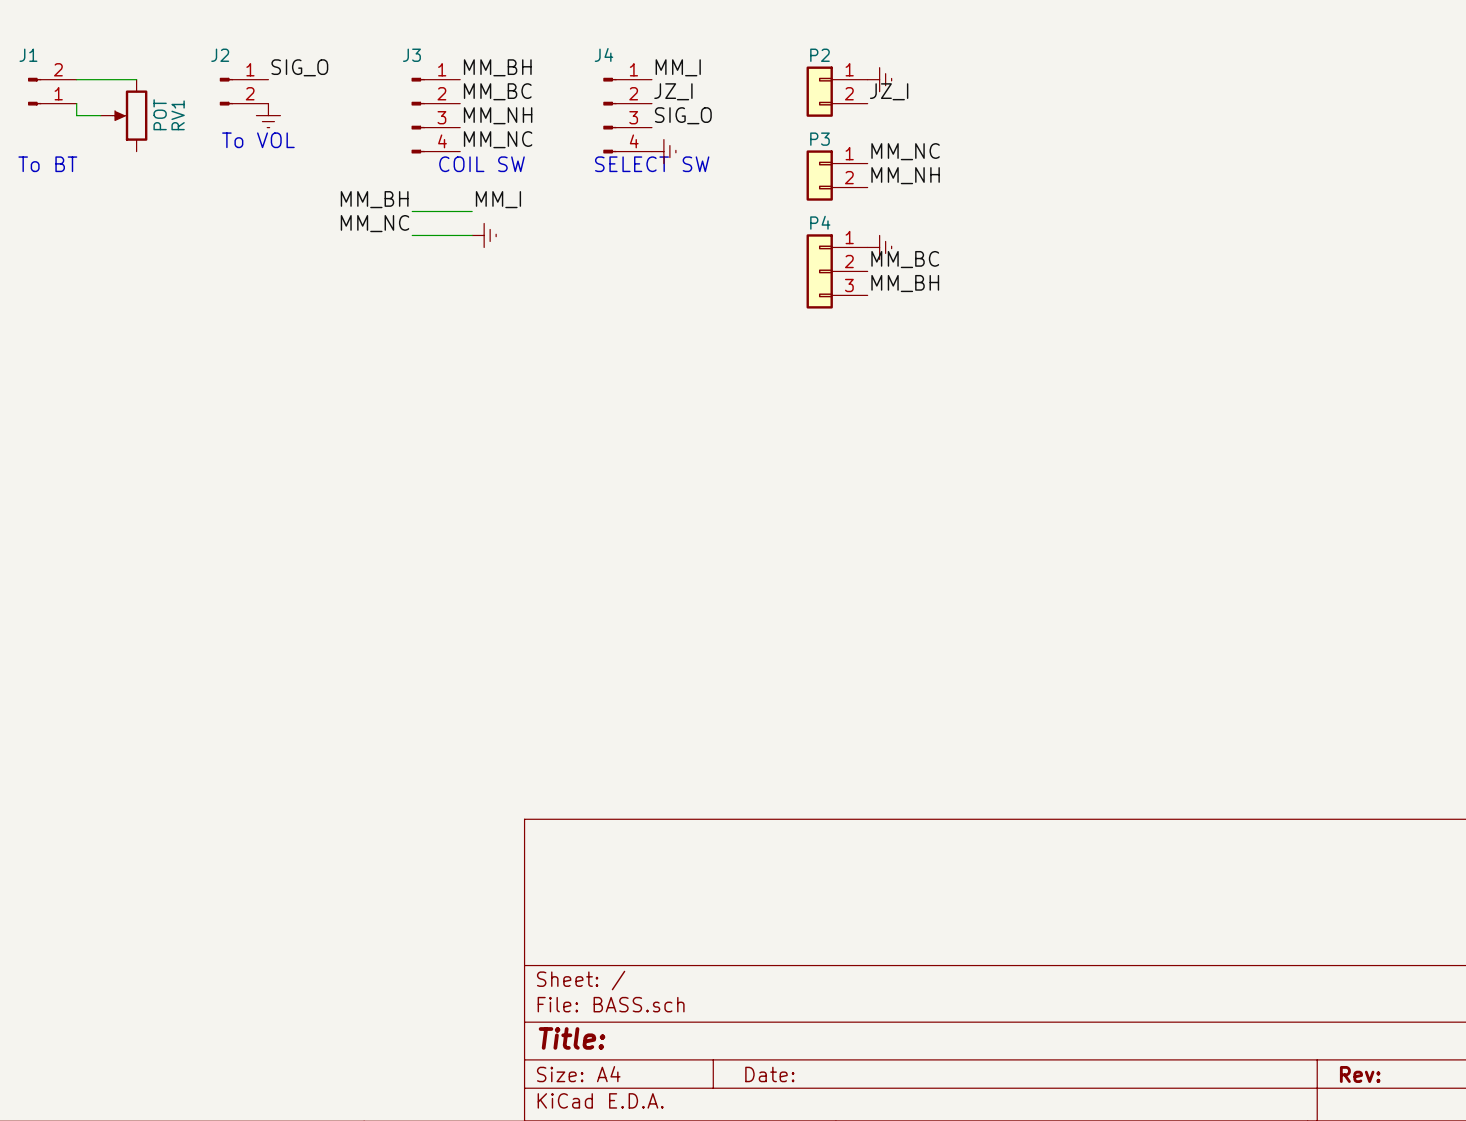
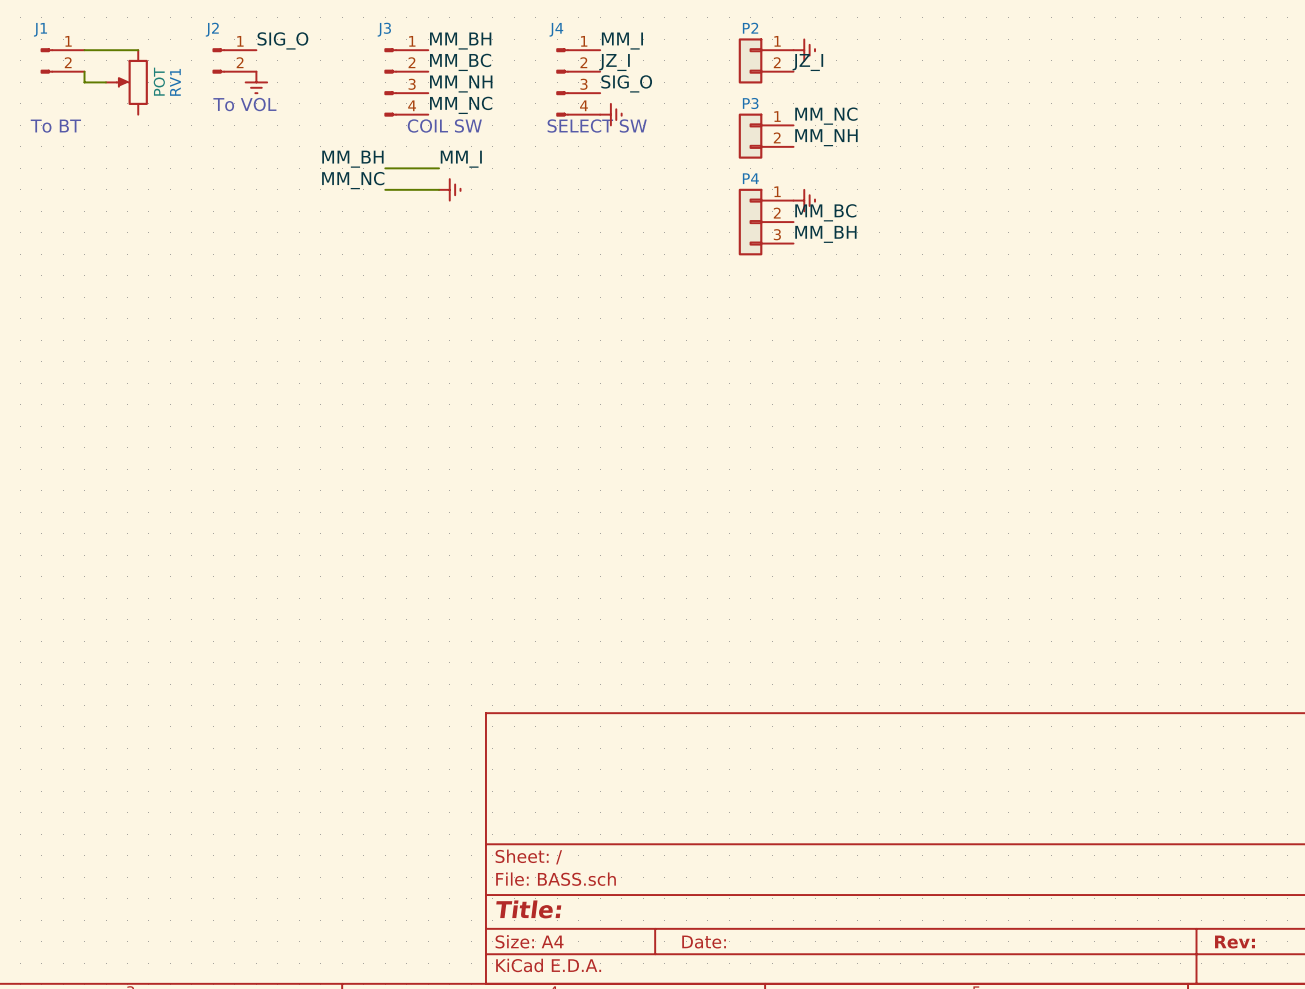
J1 flip: as is (34, 91) -> up-down (46, 60)
RV1 flip: as is (130, 115) -> up-down (132, 82)

